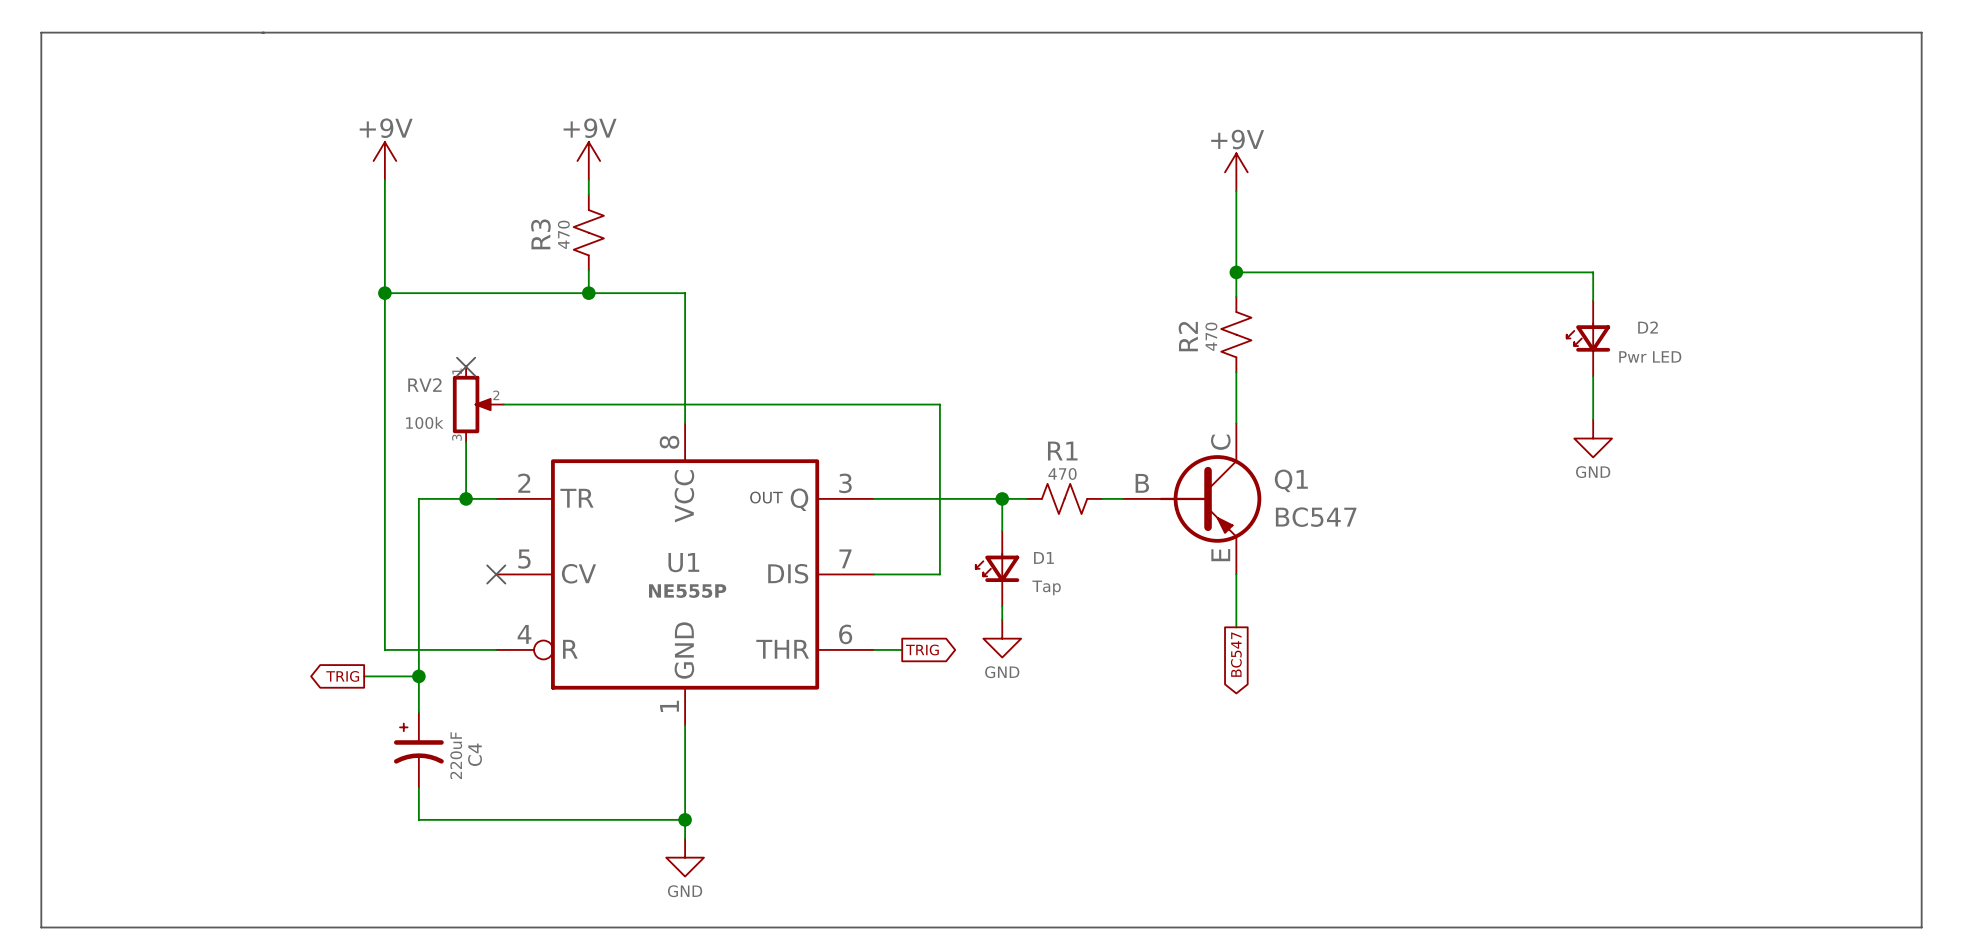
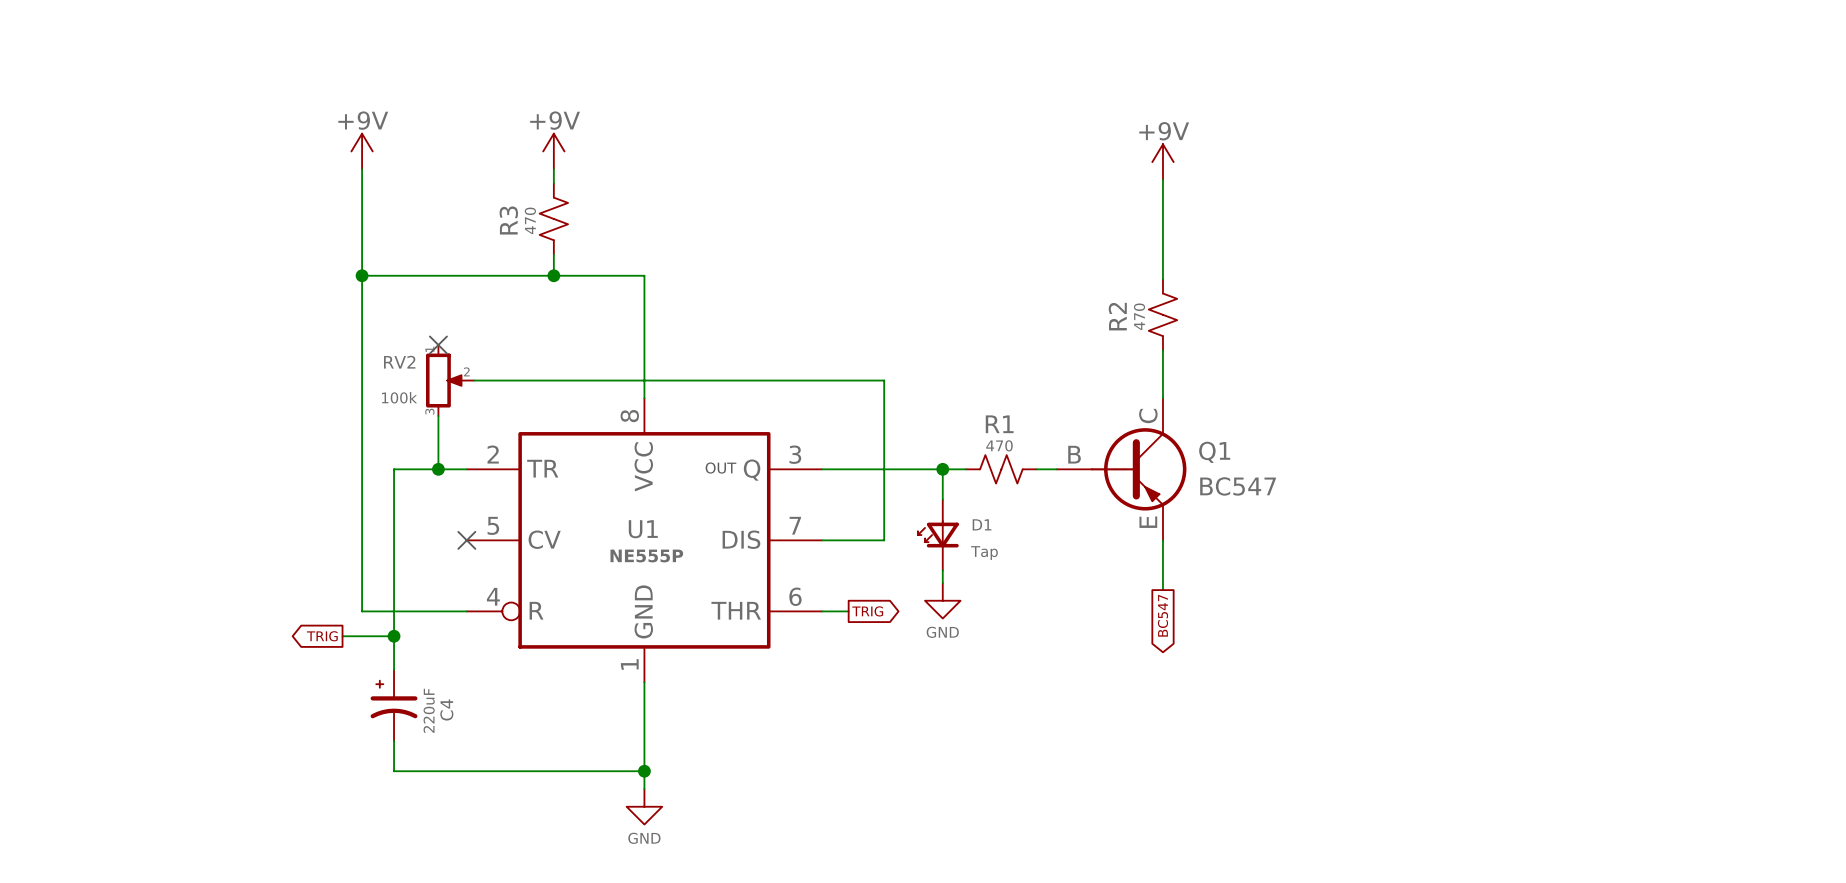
line: (41, 32) (41, 927) (1921, 927) (1921, 32) (41, 32) -> none
wire: (1236, 272) (1593, 272) (1593, 300) -> none
junction: (1236, 272) -> none
D2: Pwr LED (1588, 338) -> none
wire: (1593, 376) (1593, 419) -> none
power symbol: GND (1593, 438) -> none

